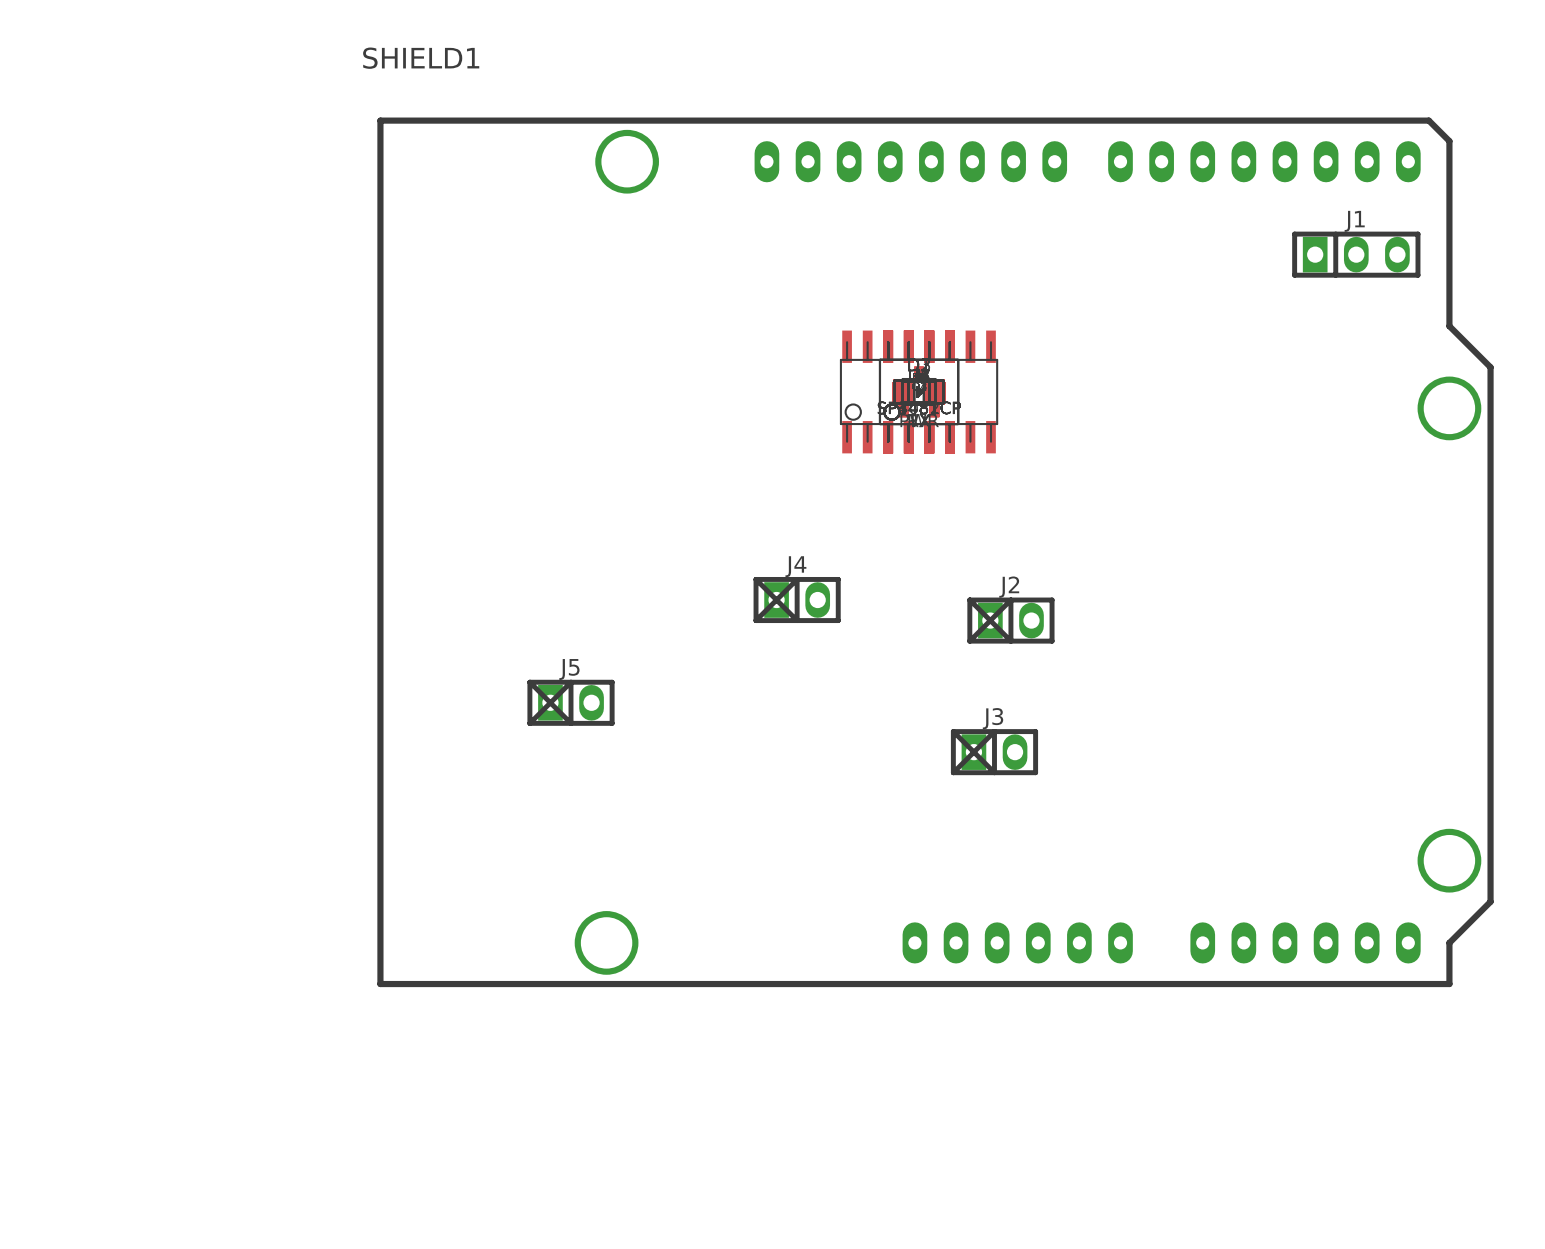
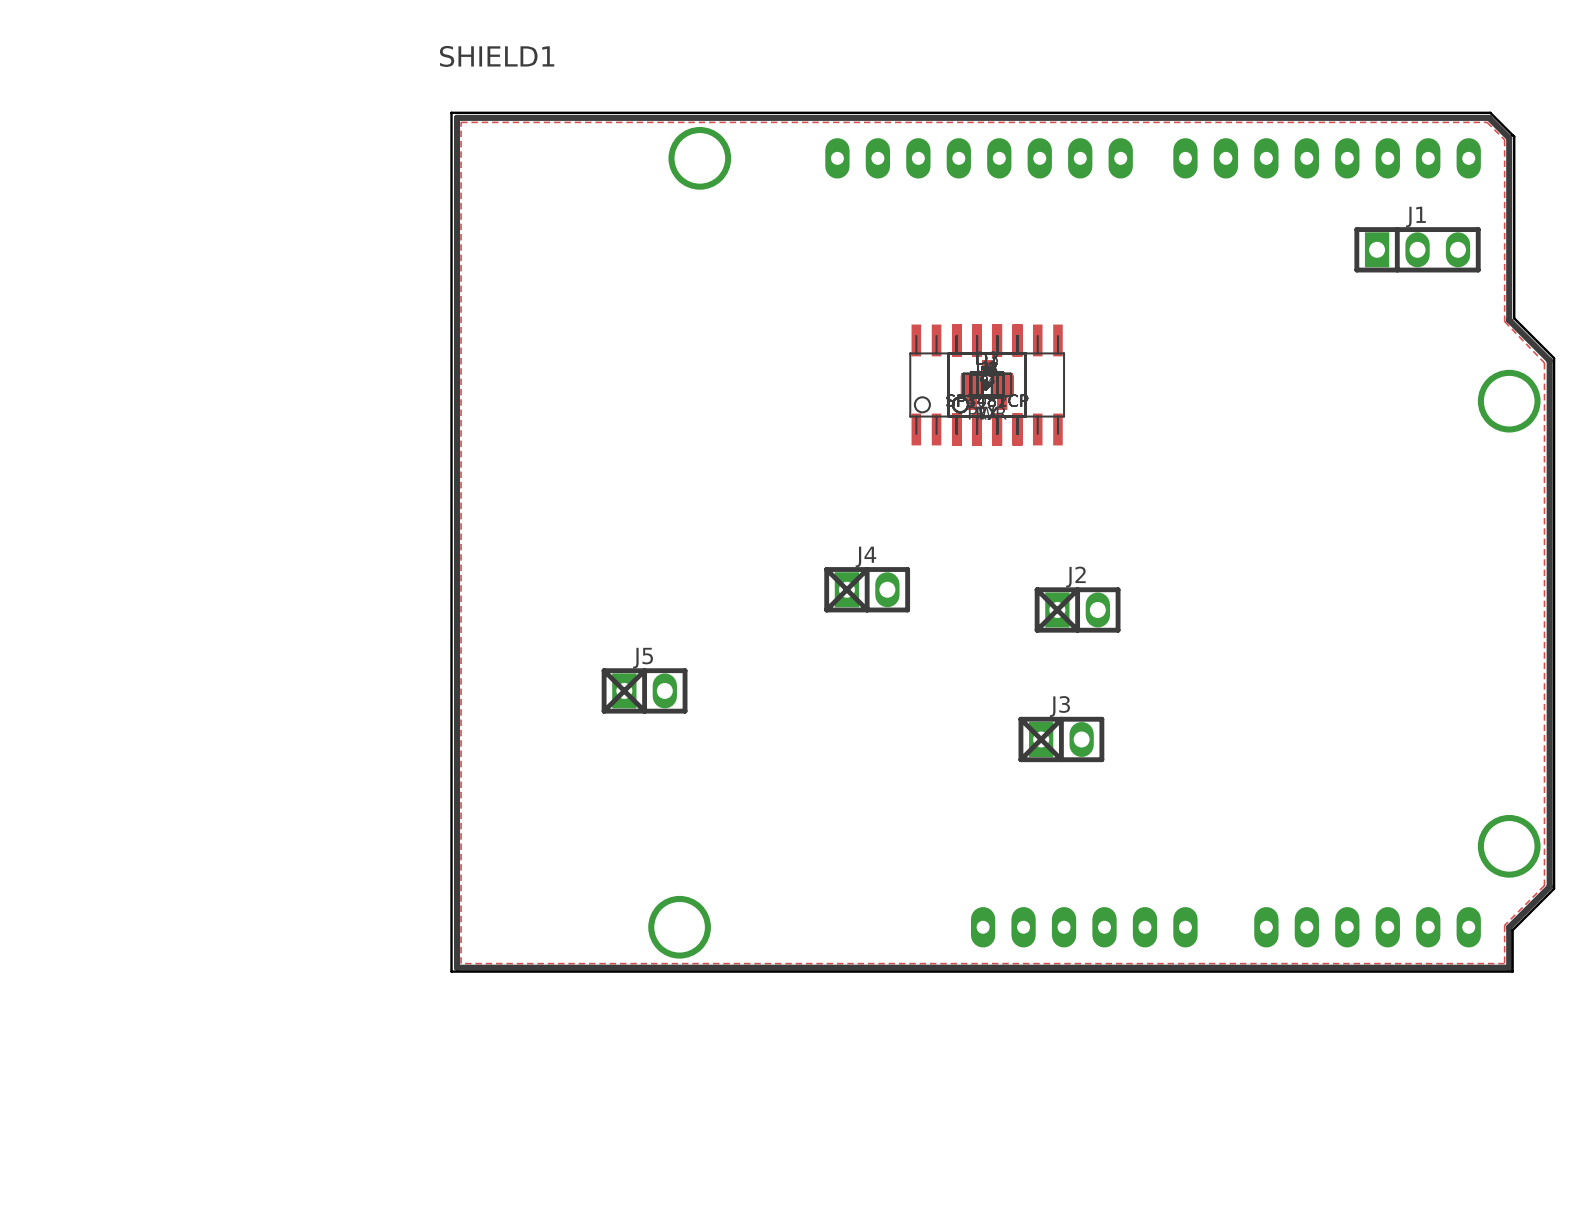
board edge: none -> (451, 112) (1490, 112) (1514, 136) (1514, 318) (1554, 358) (1554, 888) (1512, 930) (1512, 971) (451, 971) (451, 112)
zone outline: none -> (461, 122) (461, 963) (1504, 963) (1504, 925) (1544, 885) (1544, 362) (1504, 321) (1504, 139) (1487, 122) (461, 122)

